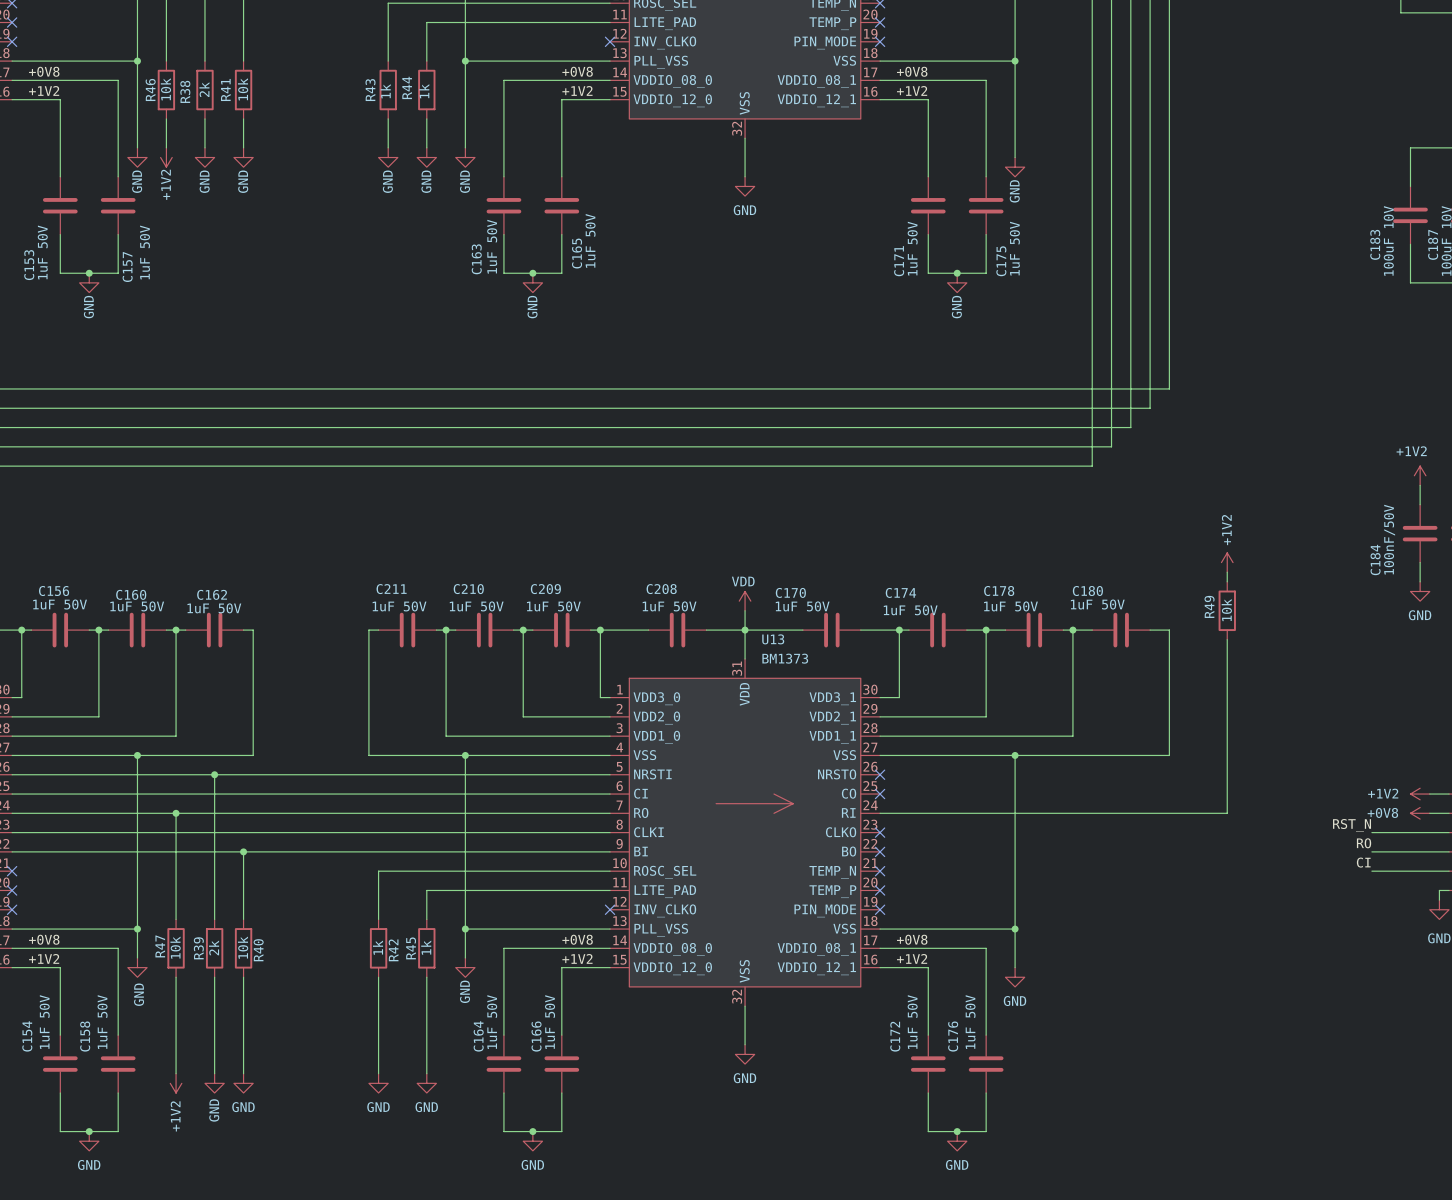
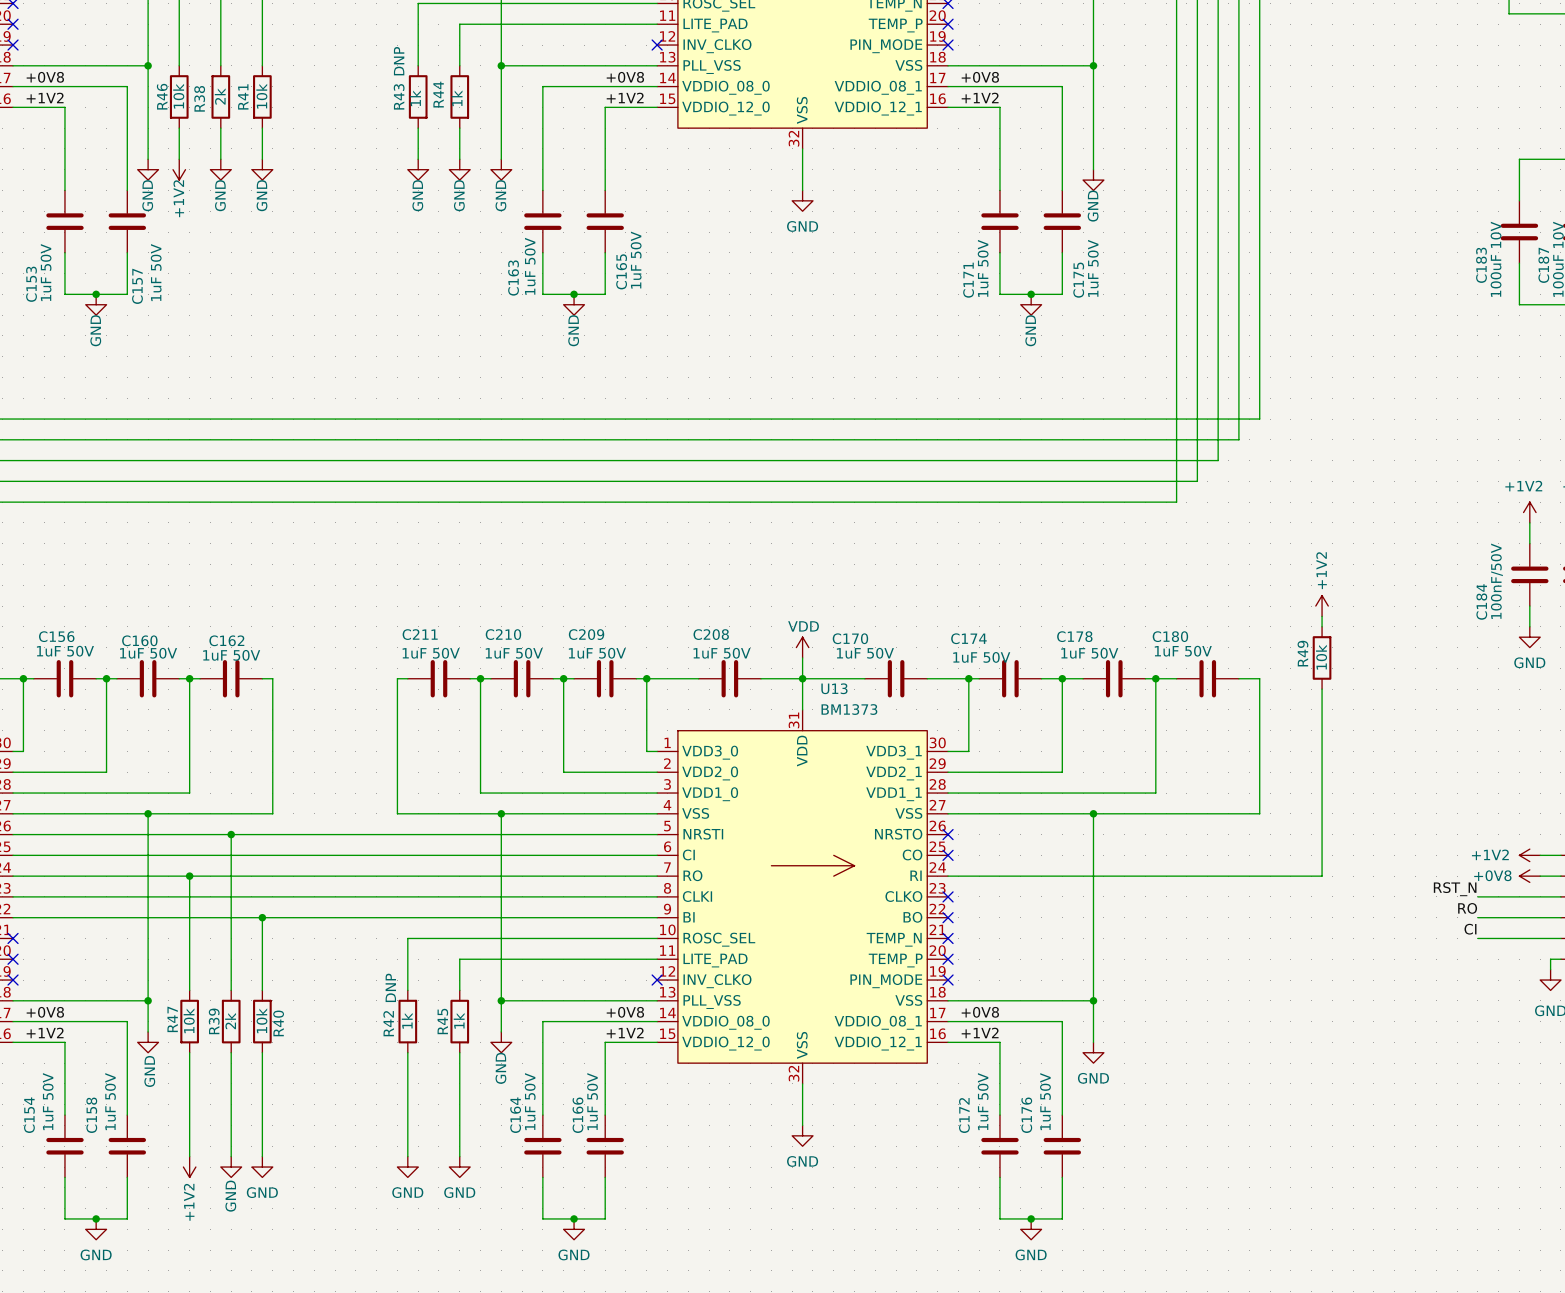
R43 text: none -> DNP (399, 61)
R42 text: none -> DNP (390, 987)
R42 name position: R42 (393, 950) -> R42 (388, 1023)

